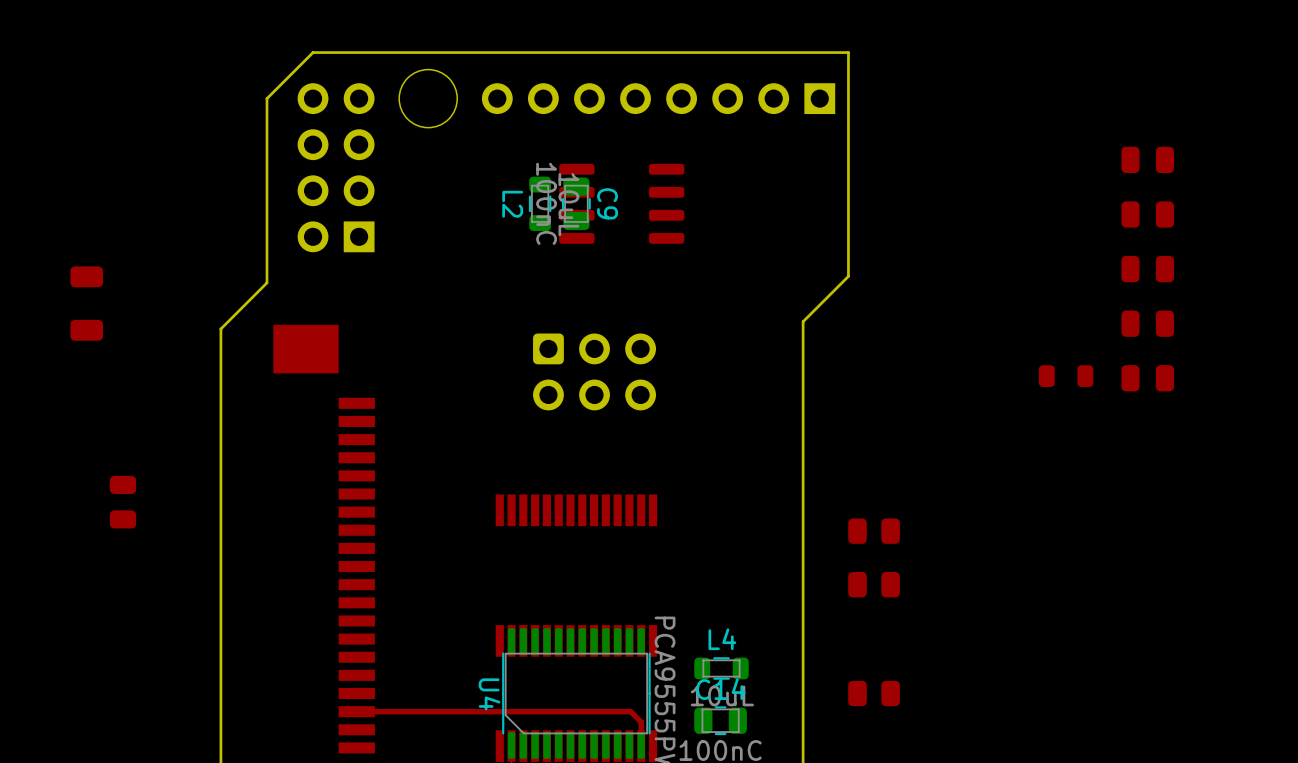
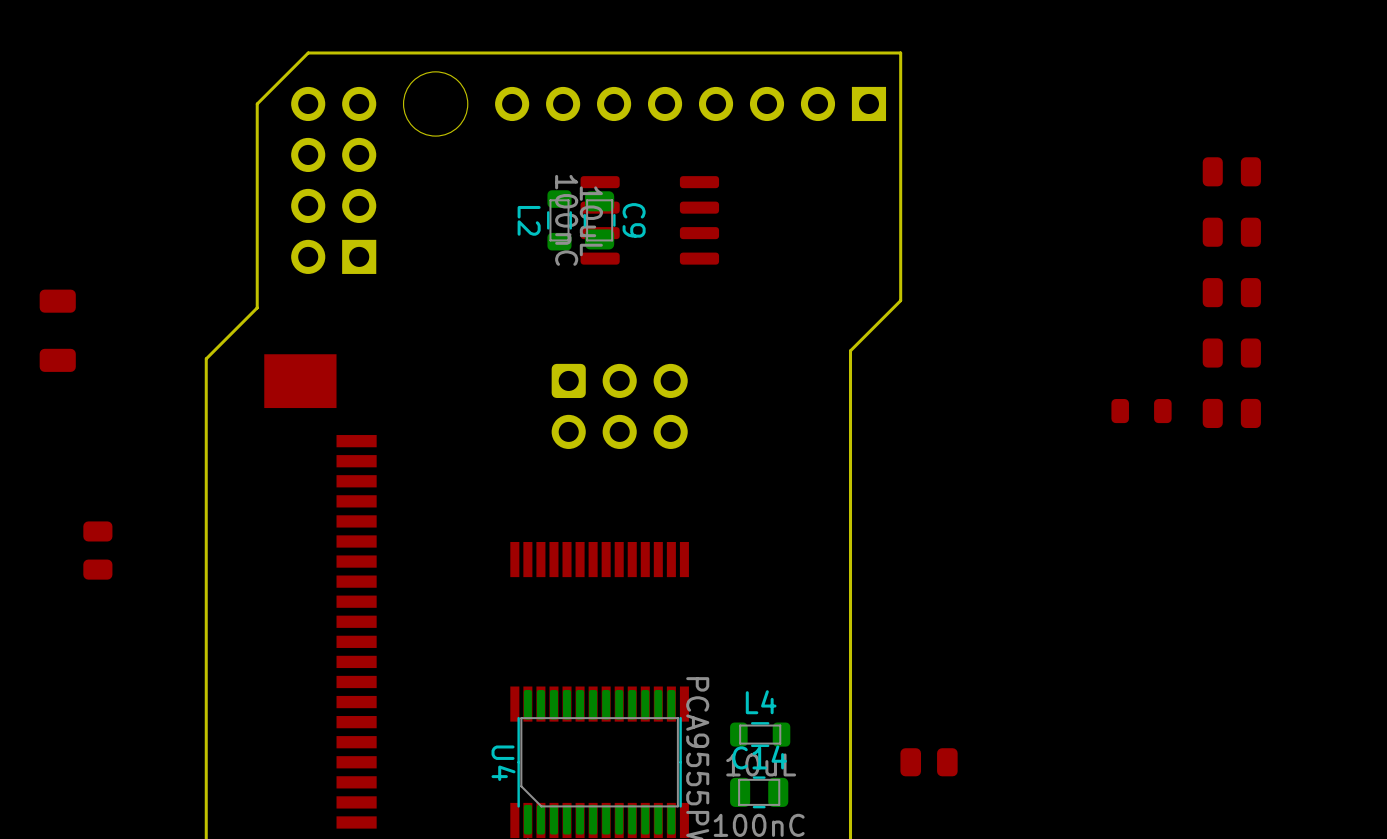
part: (874, 531) -> none
part: (874, 584) -> none
top track: (356, 711) (630, 711) (641, 722) (641, 746) -> none

